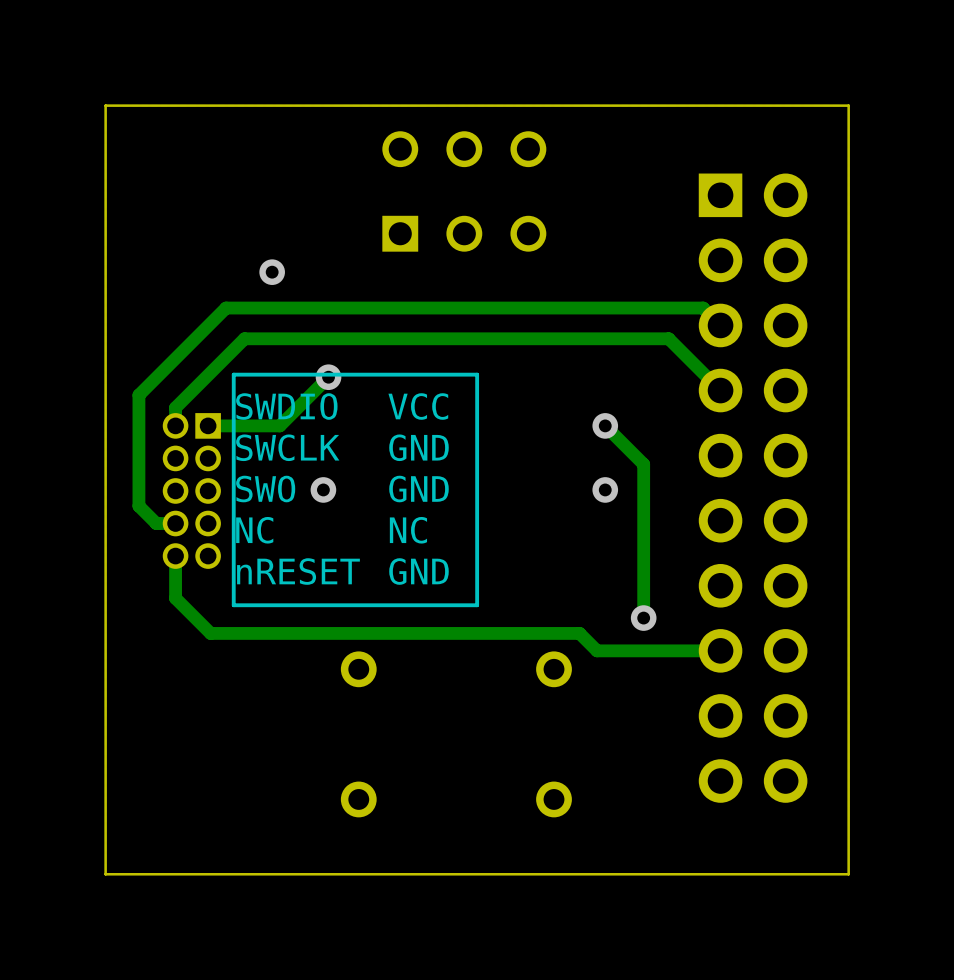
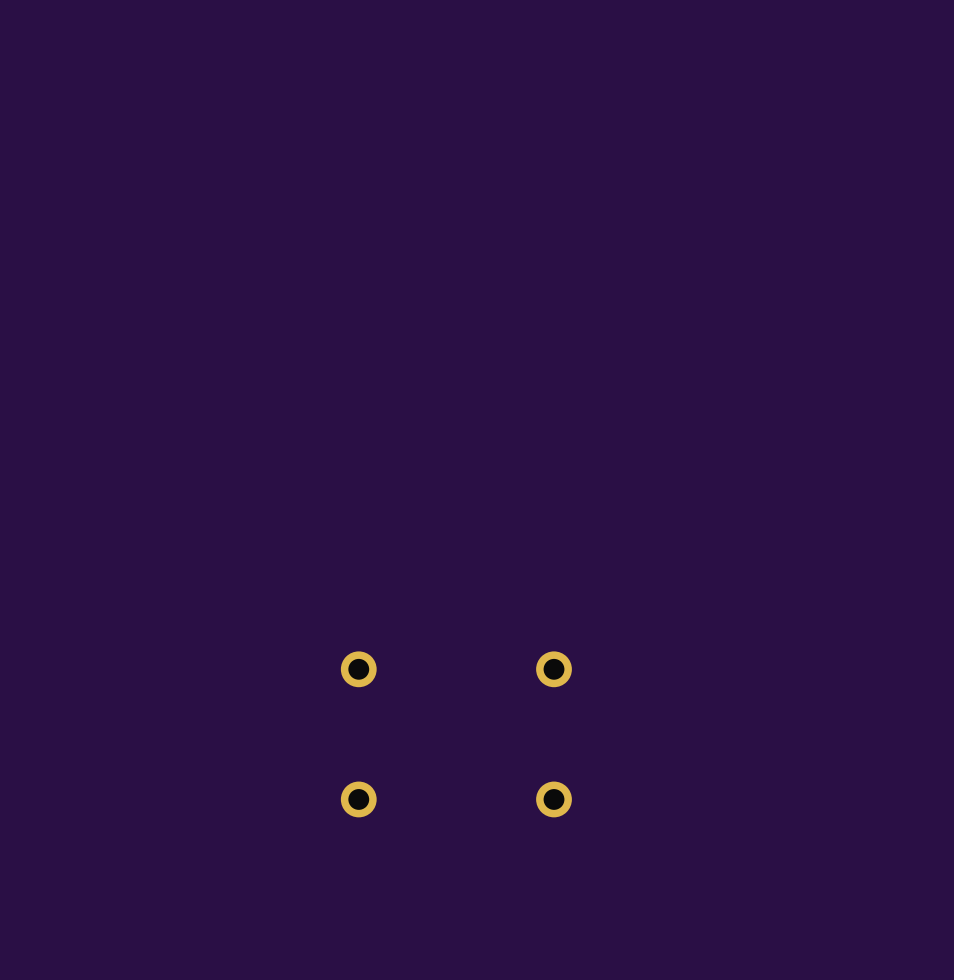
board edge: (848, 105) (105, 105) (105, 874) (848, 874) (848, 105) -> none
part: (464, 191) -> none
via: (272, 272) -> none
track: (720, 325) (703, 308) (226, 308) (138, 395) (138, 506) (156, 523) (175, 523) -> none
line: (477, 374) (477, 605) (233, 605) (233, 374) (477, 374) -> none
track: (328, 377) (279, 425) (208, 425) -> none
via: (328, 377) -> none
track: (720, 390) (668, 338) (244, 338) (175, 407) (175, 425) -> none
text: SWDIO (286, 406) -> none
text: VCC (418, 406) -> none
track: (605, 425) (643, 464) (643, 618) -> none
via: (605, 425) -> none
text: SWCLK (287, 447) -> none
text: GND (418, 447) -> none
part: (753, 488) -> none
text: SWO (265, 489) -> none
via: (323, 489) -> none
text: GND (418, 489) -> none
via: (605, 489) -> none
part: (191, 490) -> none
text: NC (254, 530) -> none
text: NC (408, 530) -> none
track: (175, 556) (175, 598) (210, 633) (579, 633) (597, 650) (720, 650) -> none
text: nRESET (298, 571) -> none
text: GND (418, 571) -> none
via: (643, 618) -> none

